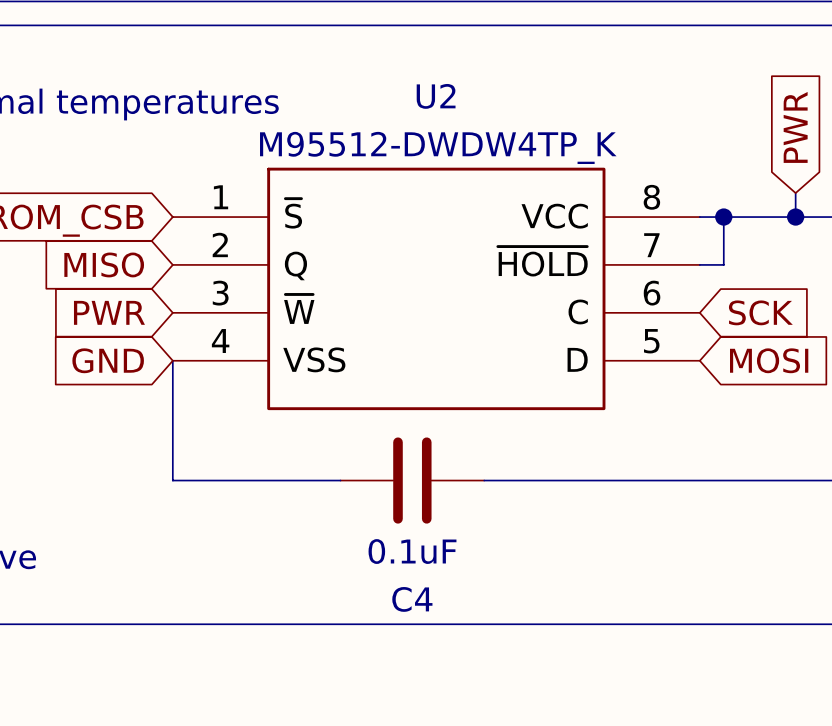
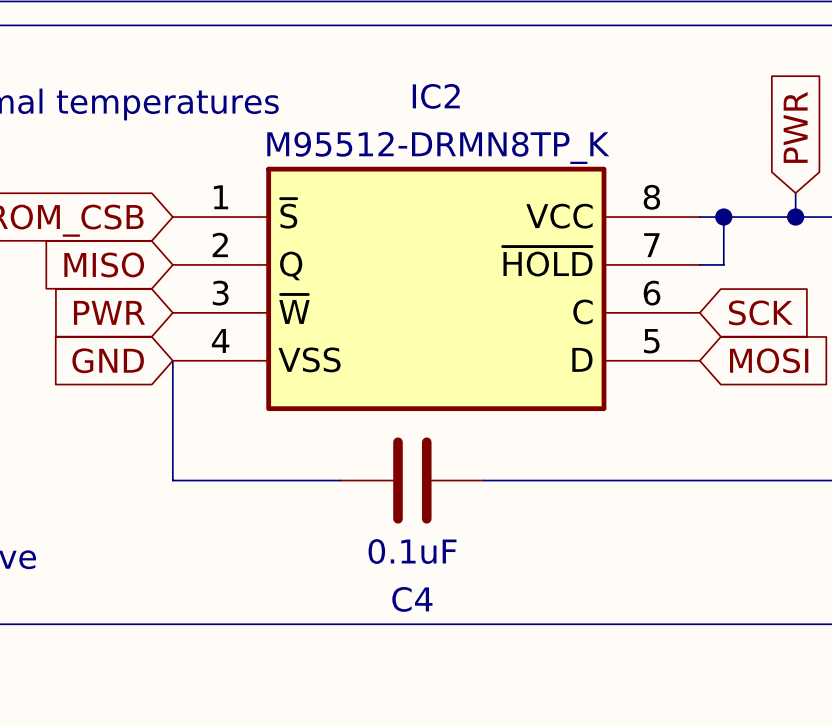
U2: M95512-DWDW4TP_K (436, 288) -> none
IC2: none -> M95512-DRMN8TP_K (436, 288)

